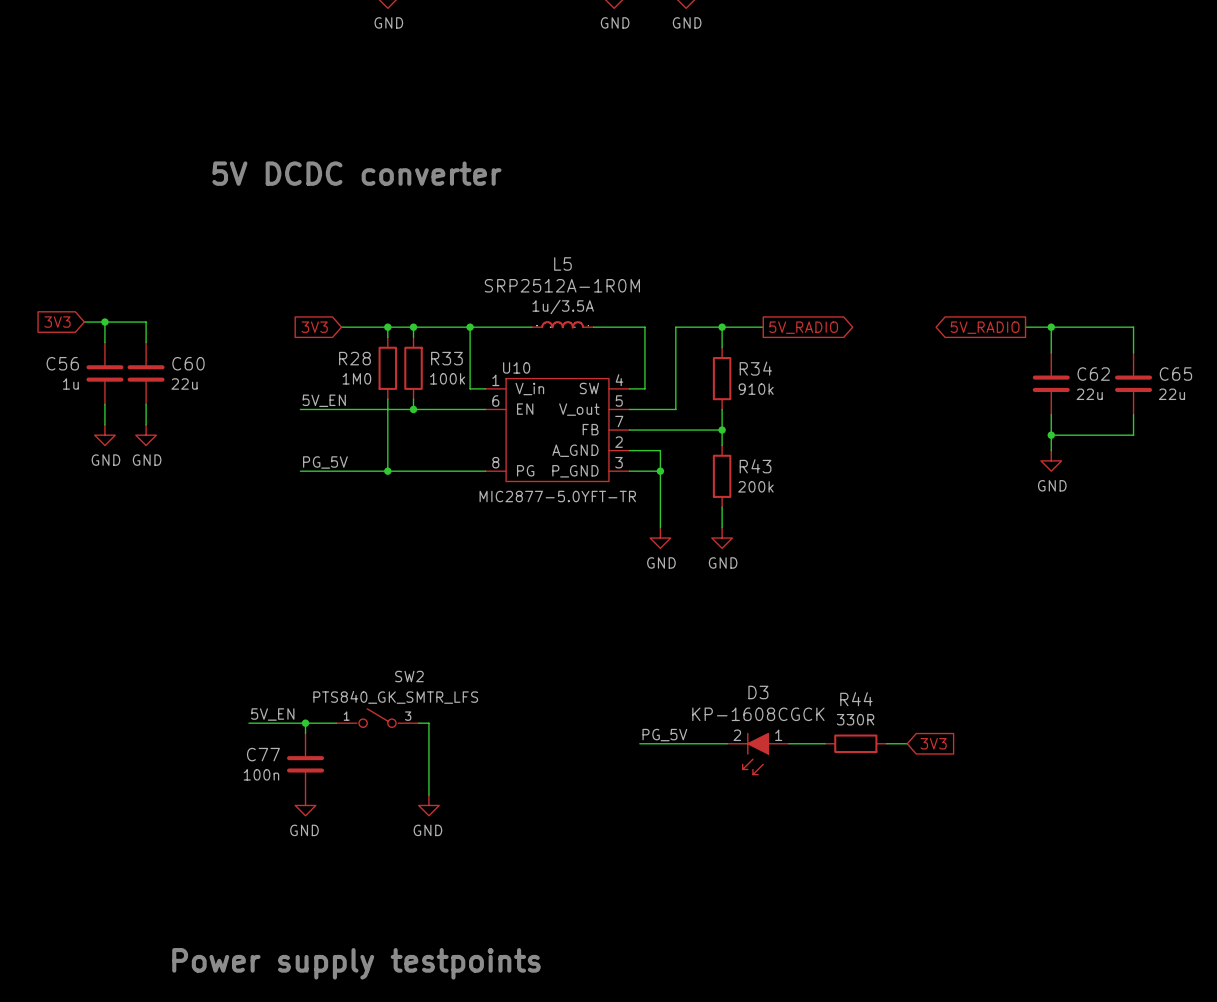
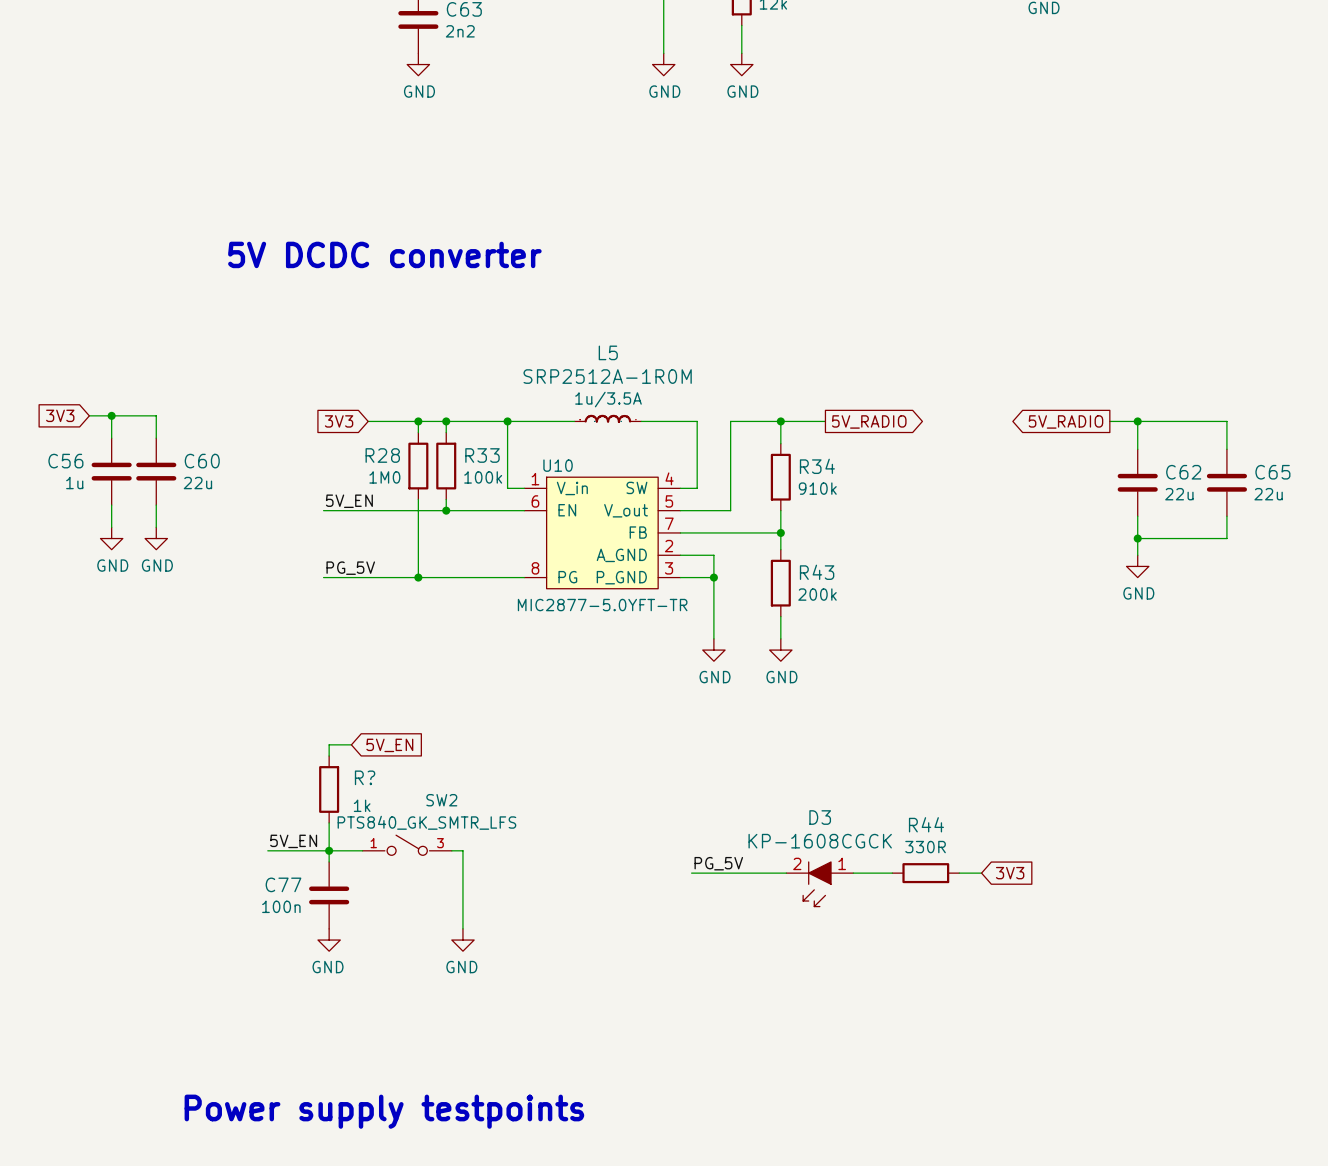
wire: none -> (351, 744) (329, 744) (329, 756)
global label: none -> 5V_EN (389, 745)
R?: none -> (329, 789)
wire: none -> (329, 822) (329, 850)

